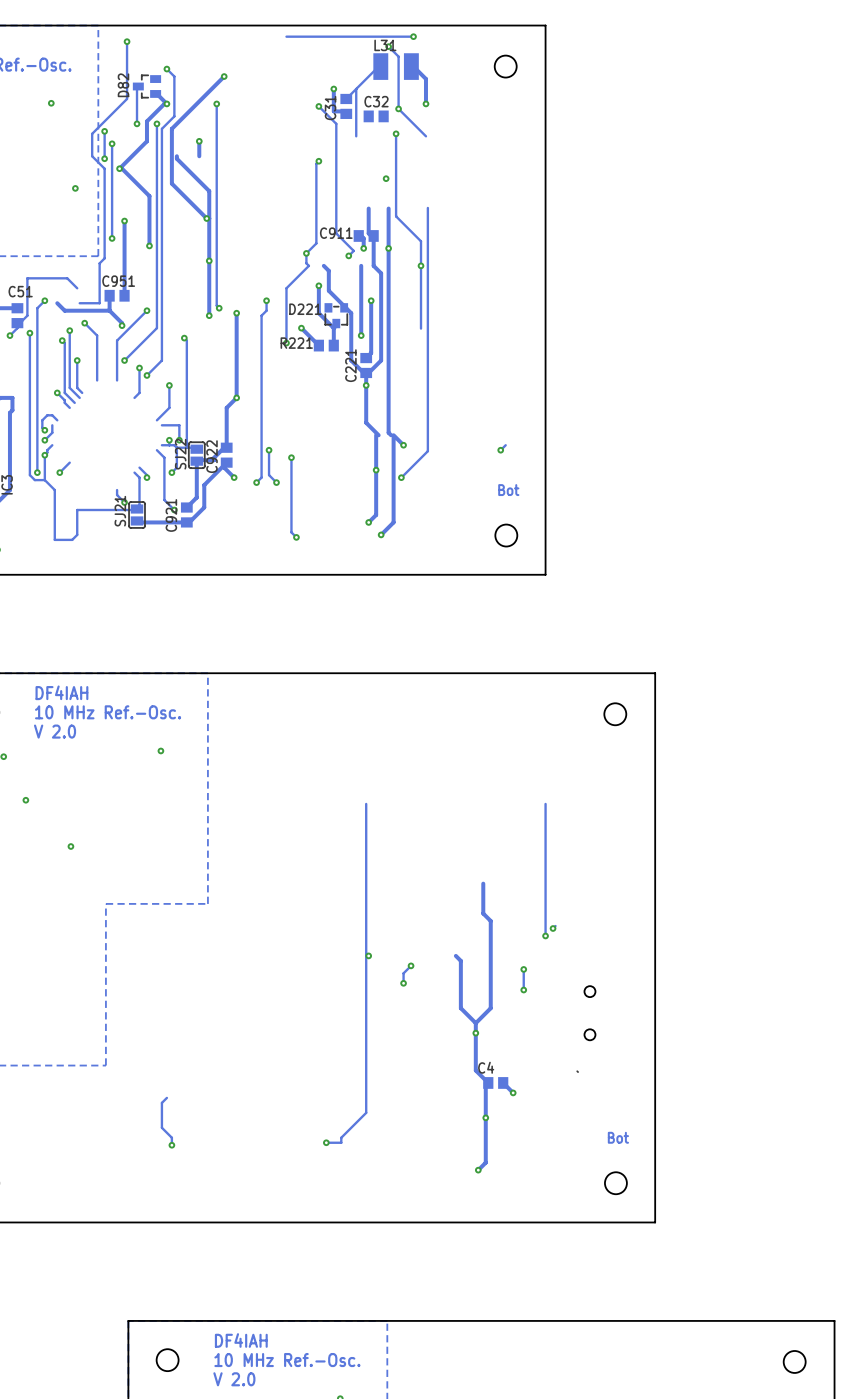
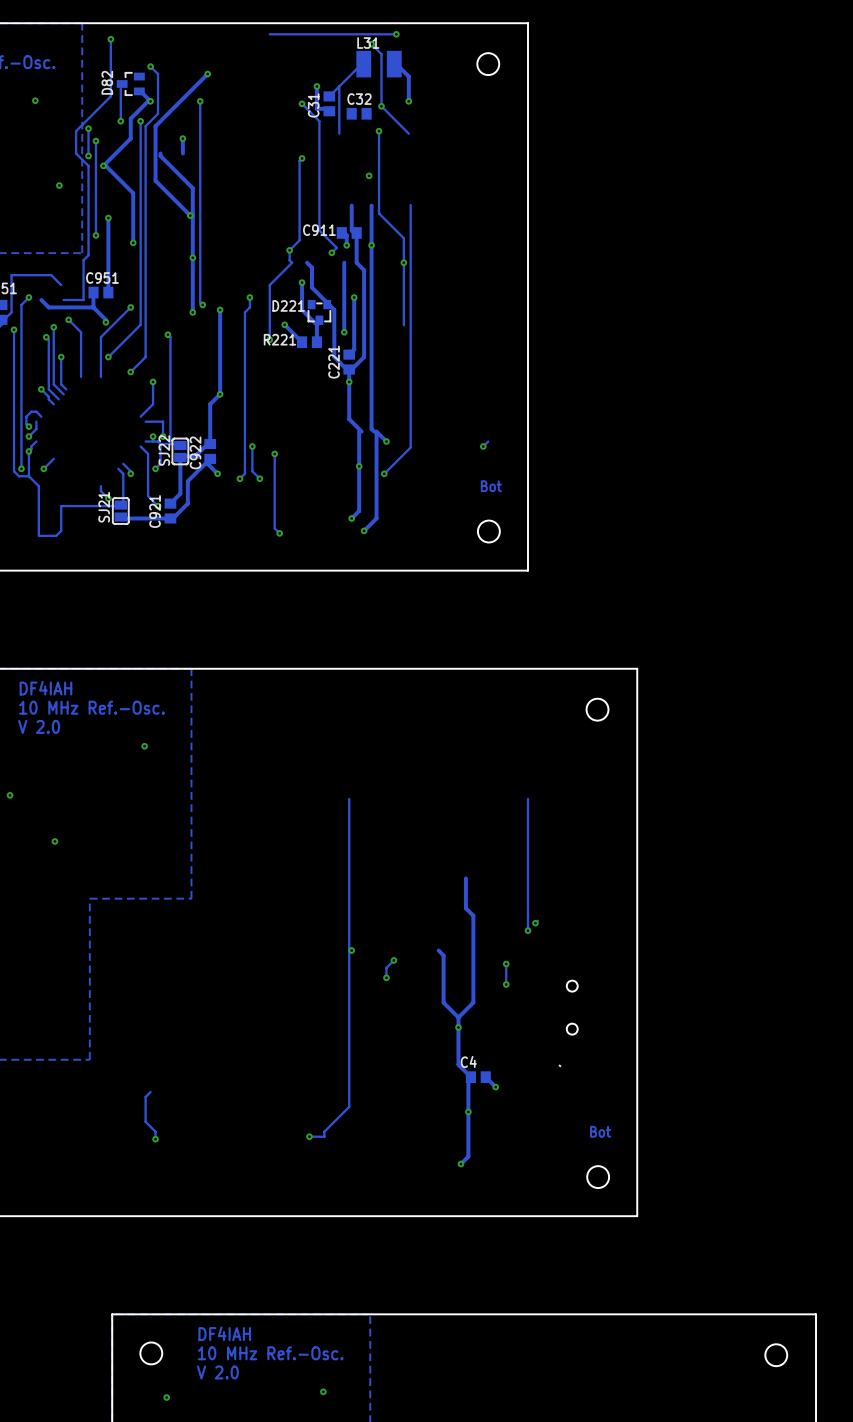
track: (139, 368) (139, 392) (134, 397) -> none
via: (139, 368) -> none

